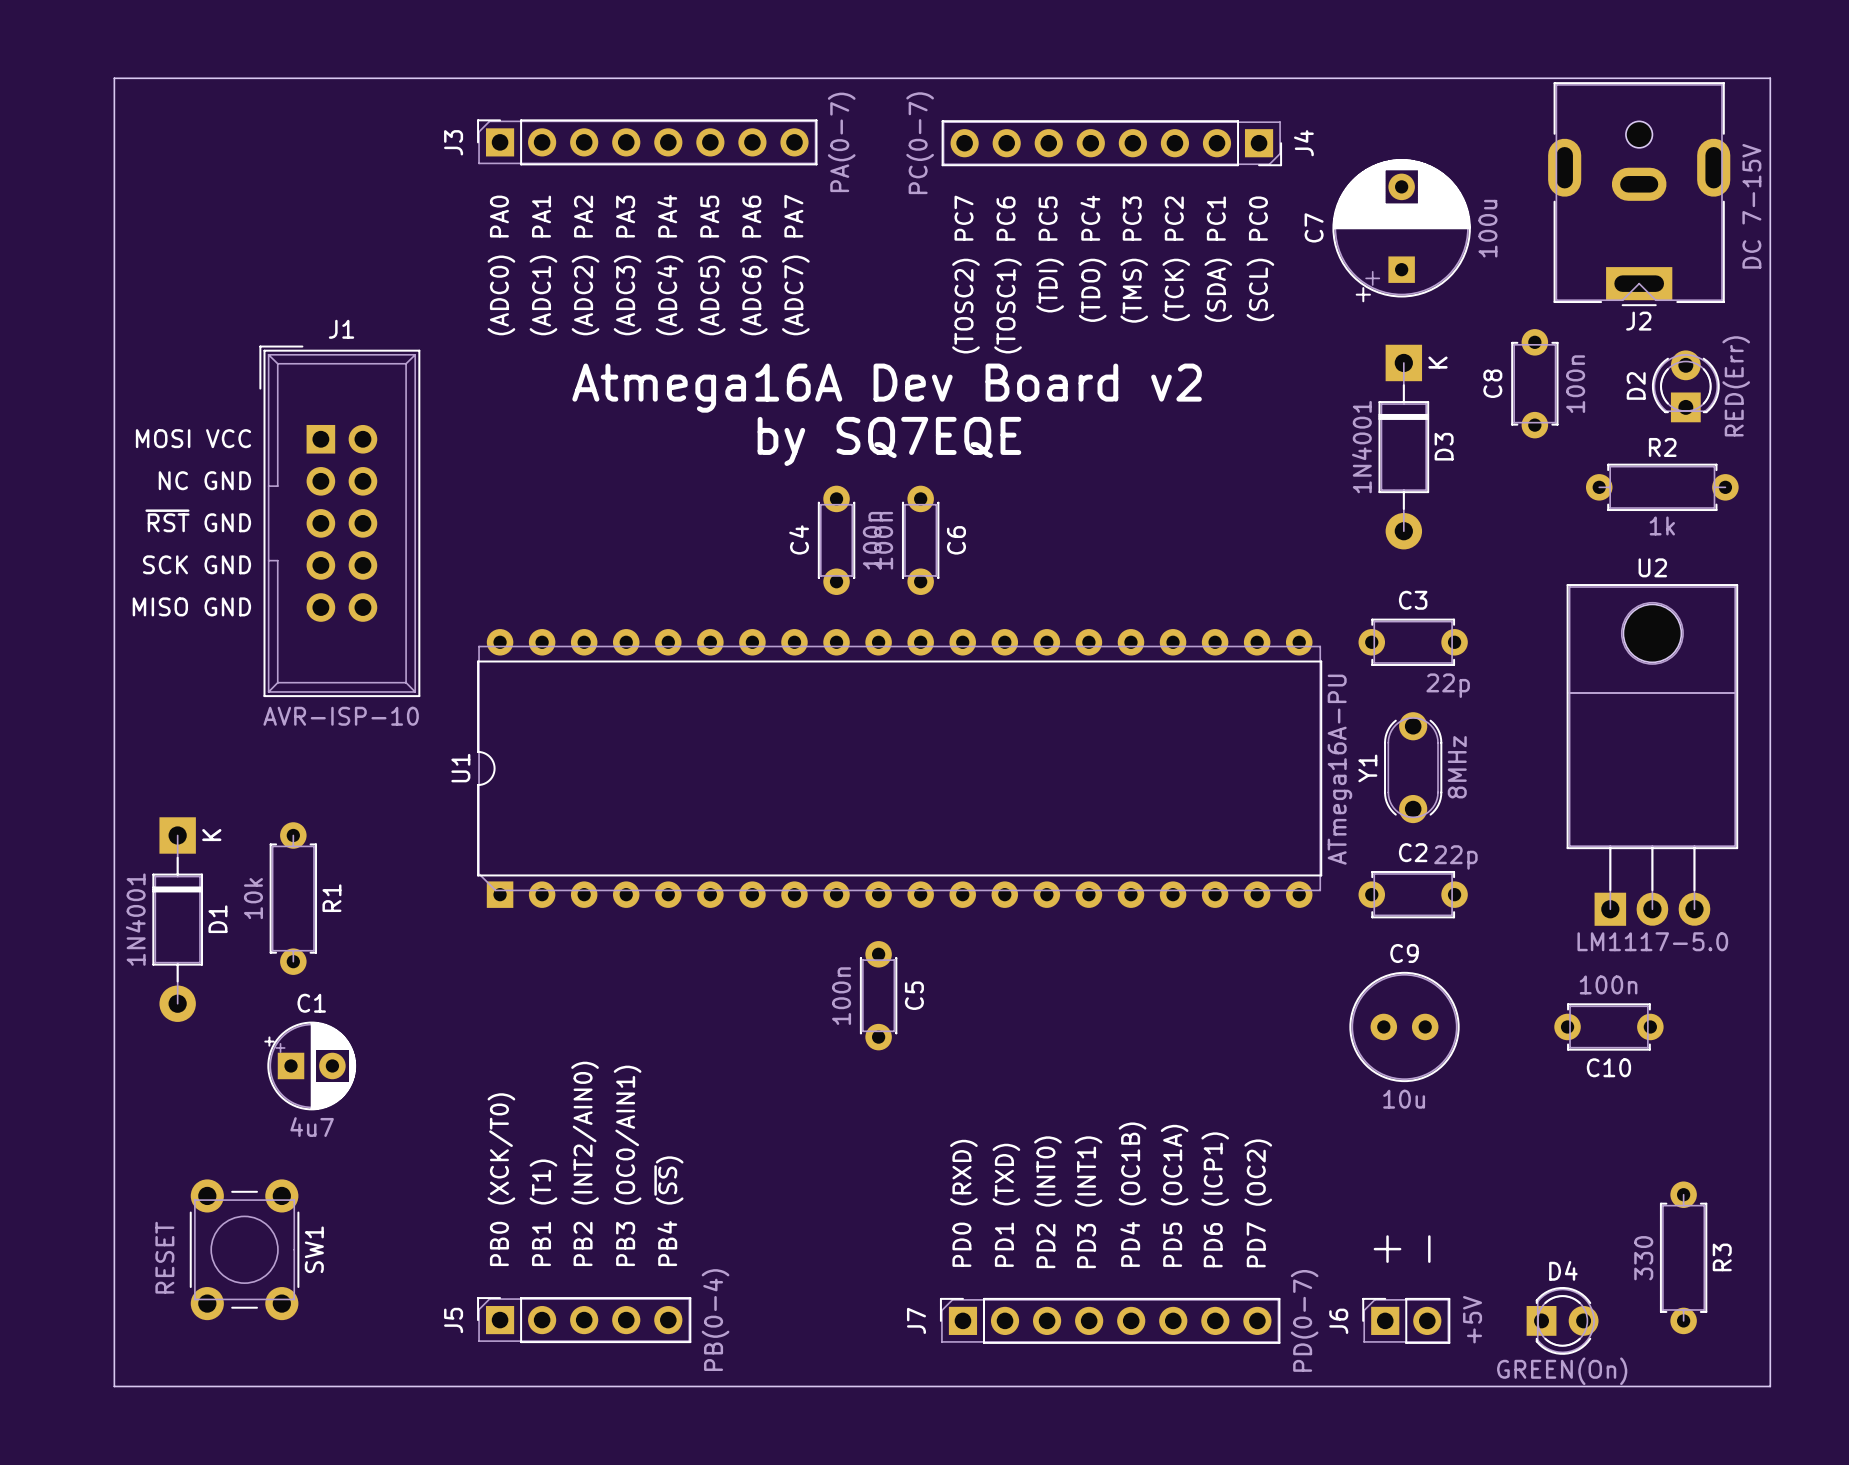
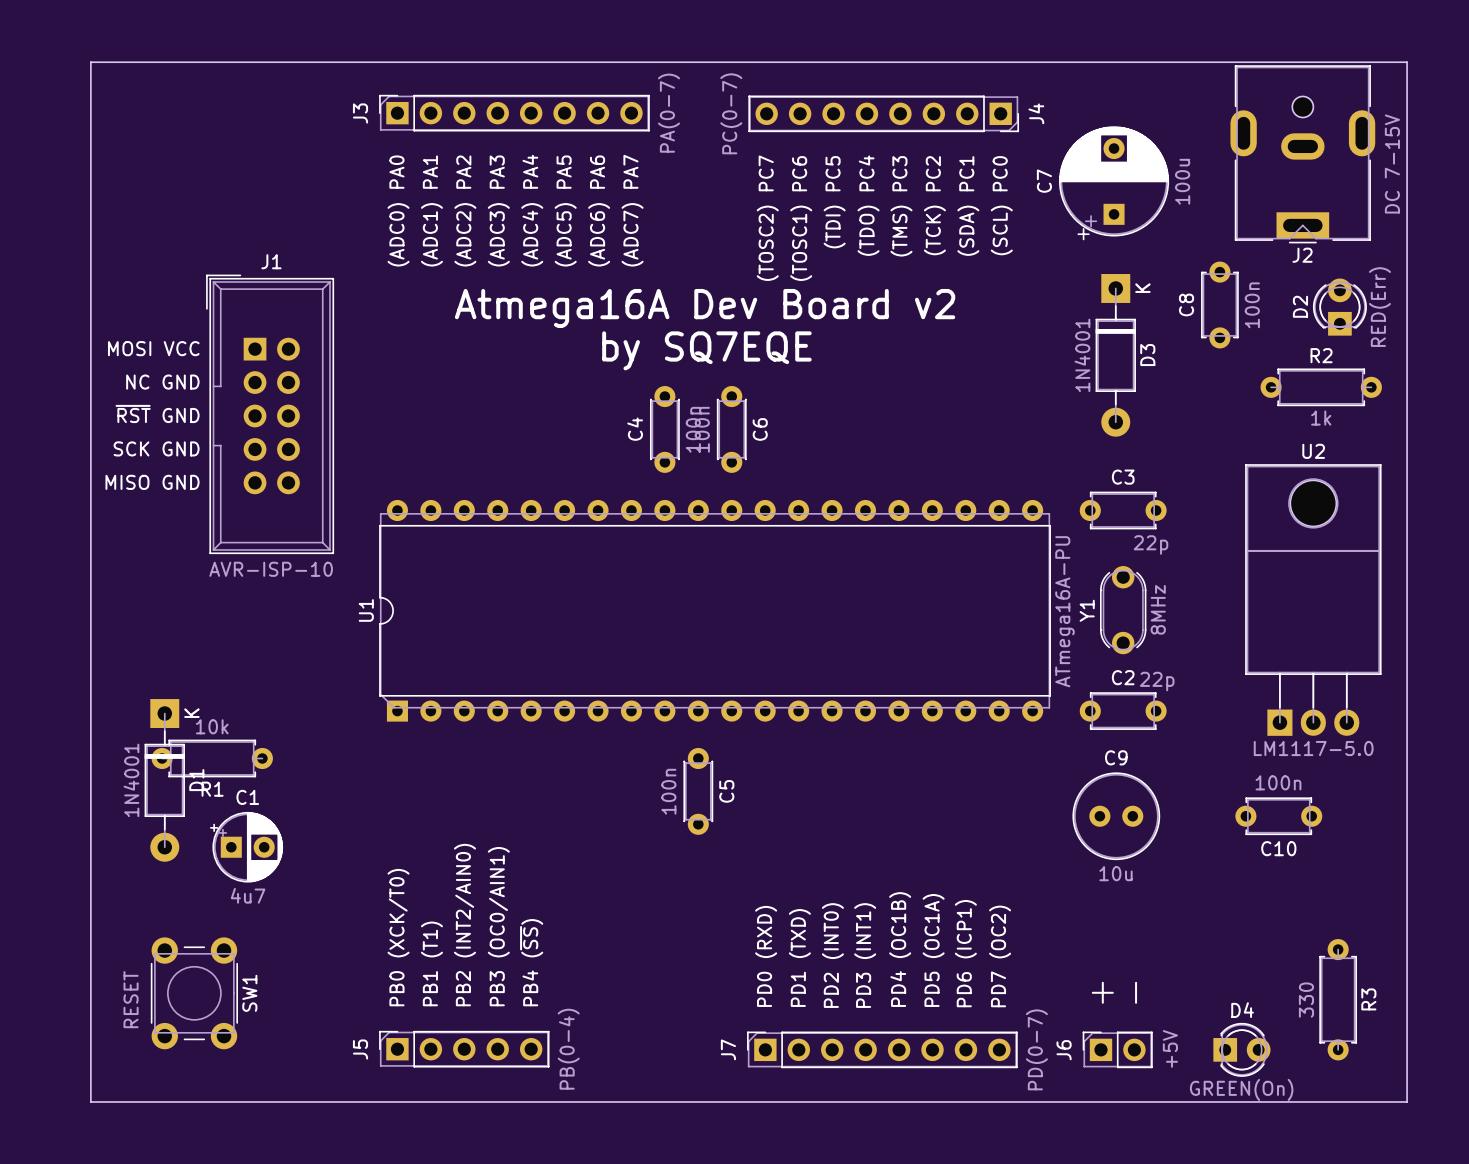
R1 rotation: 0° (293, 898) -> 90° clockwise (212, 758)
D1 position: (177, 919) -> (164, 780)

